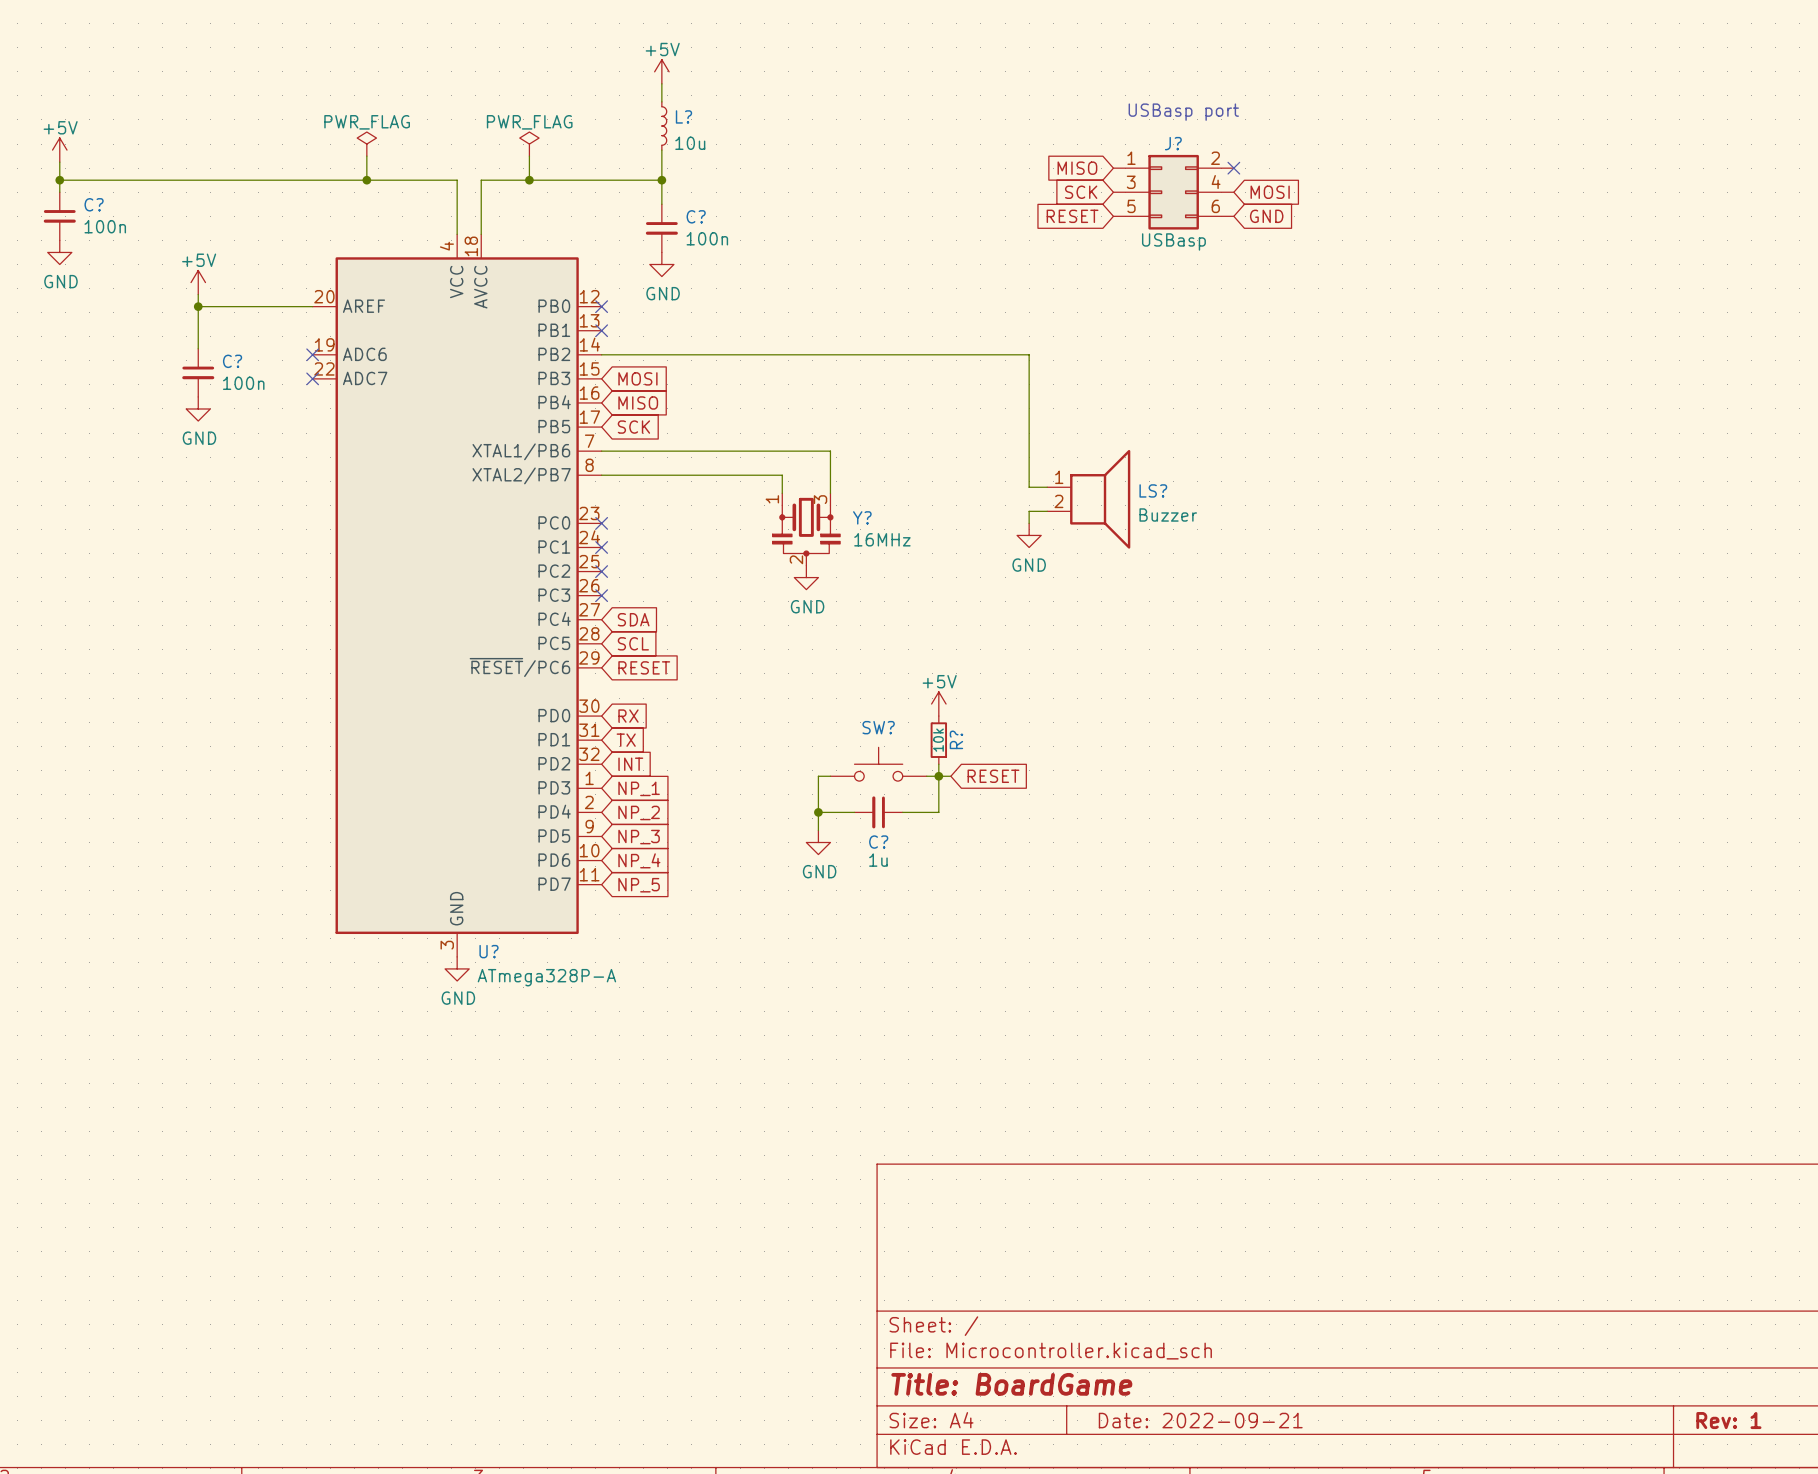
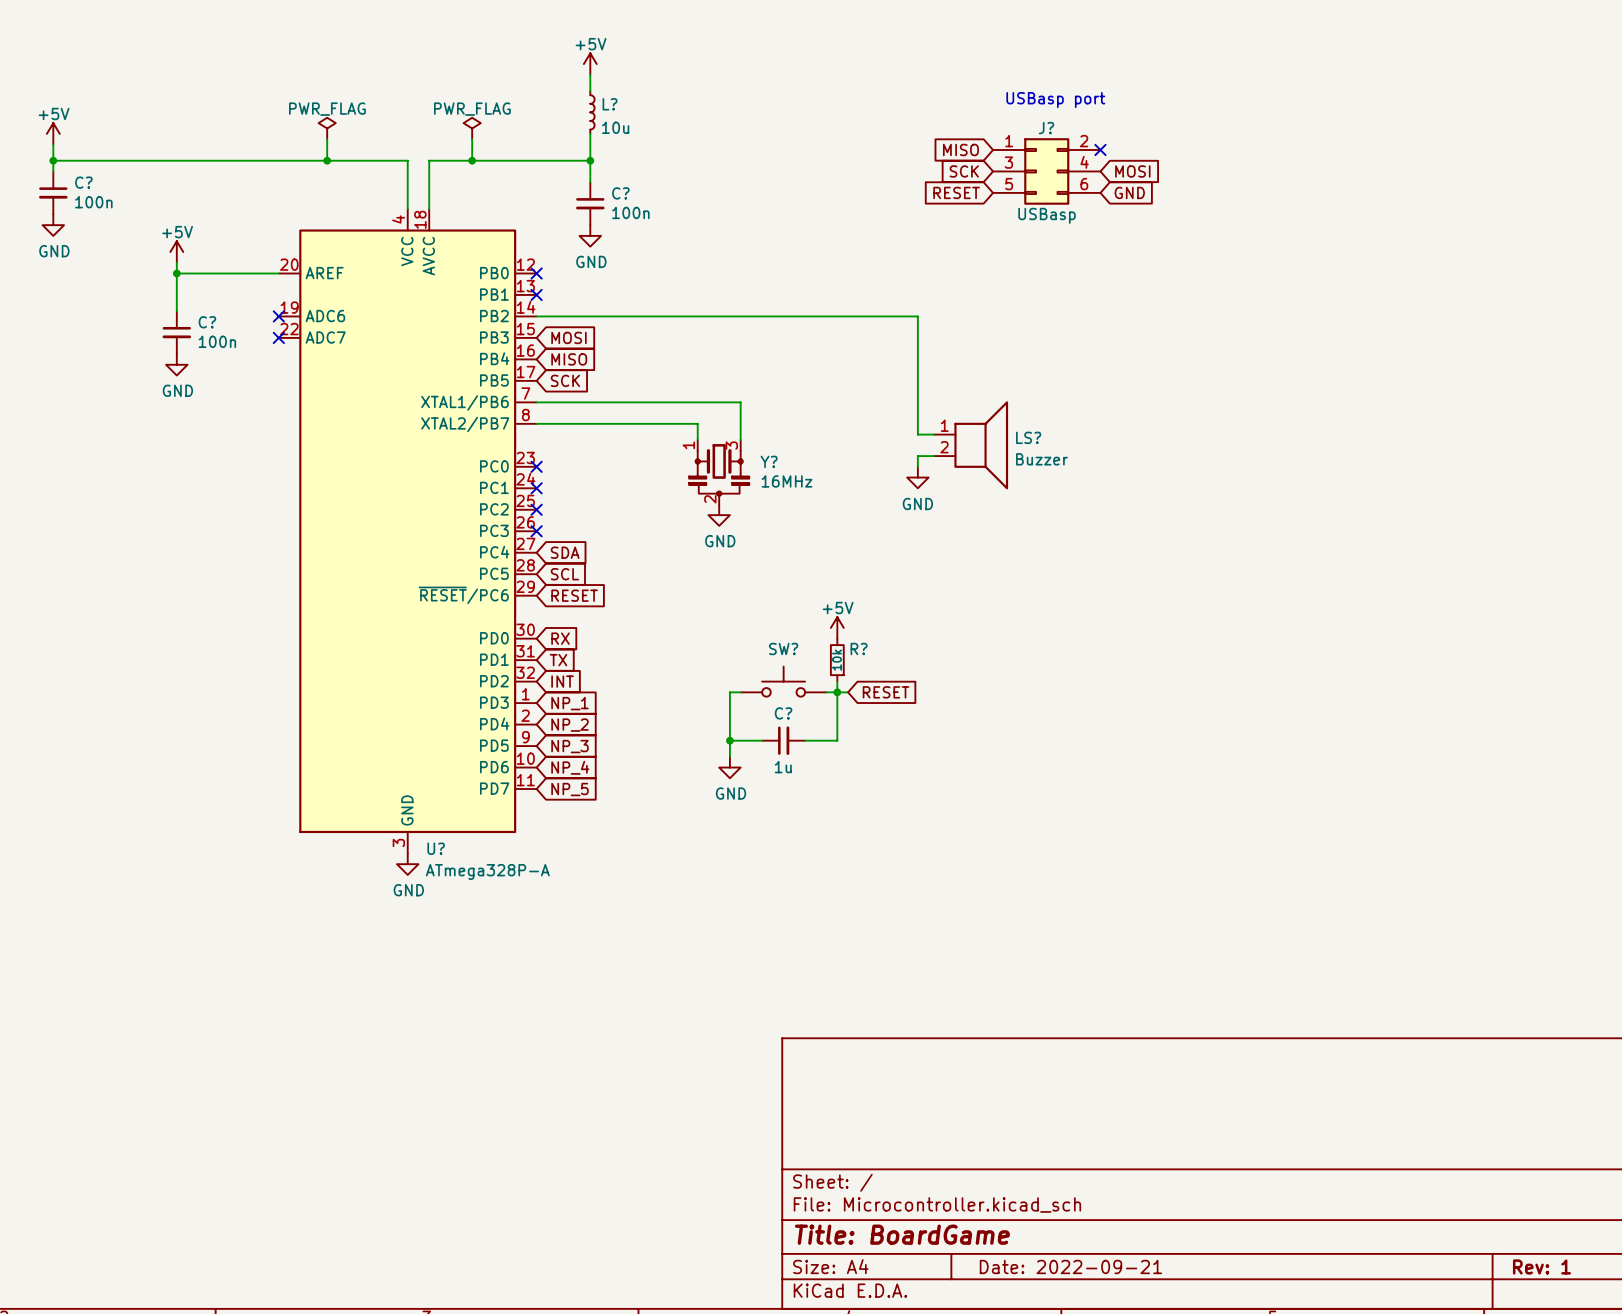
R? name rotation: 0° (956, 739) -> 90° clockwise (859, 648)
wire: (818, 812) (854, 812) -> none
junction position: (818, 812) -> (729, 740)
C? rotation: 0° (878, 812) -> 180° (783, 740)
wire: (902, 812) (938, 812) -> (805, 740) (837, 740) (837, 724)
wire: none -> (762, 740) (729, 740) (729, 756)
power symbol position: GND (818, 842) -> GND (729, 767)

